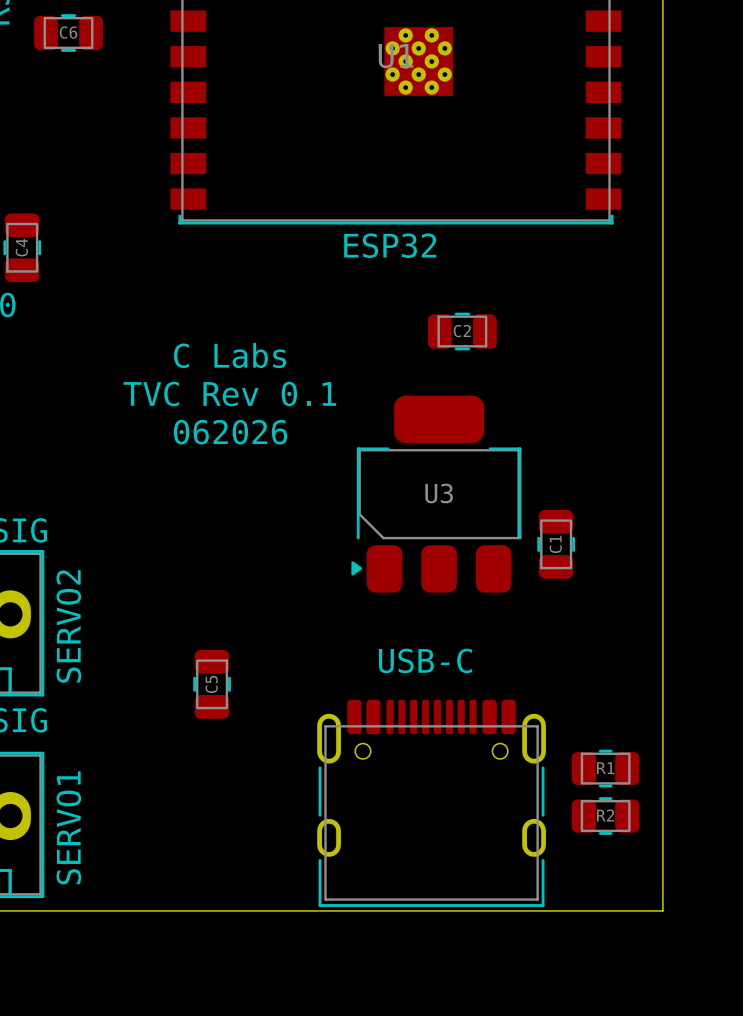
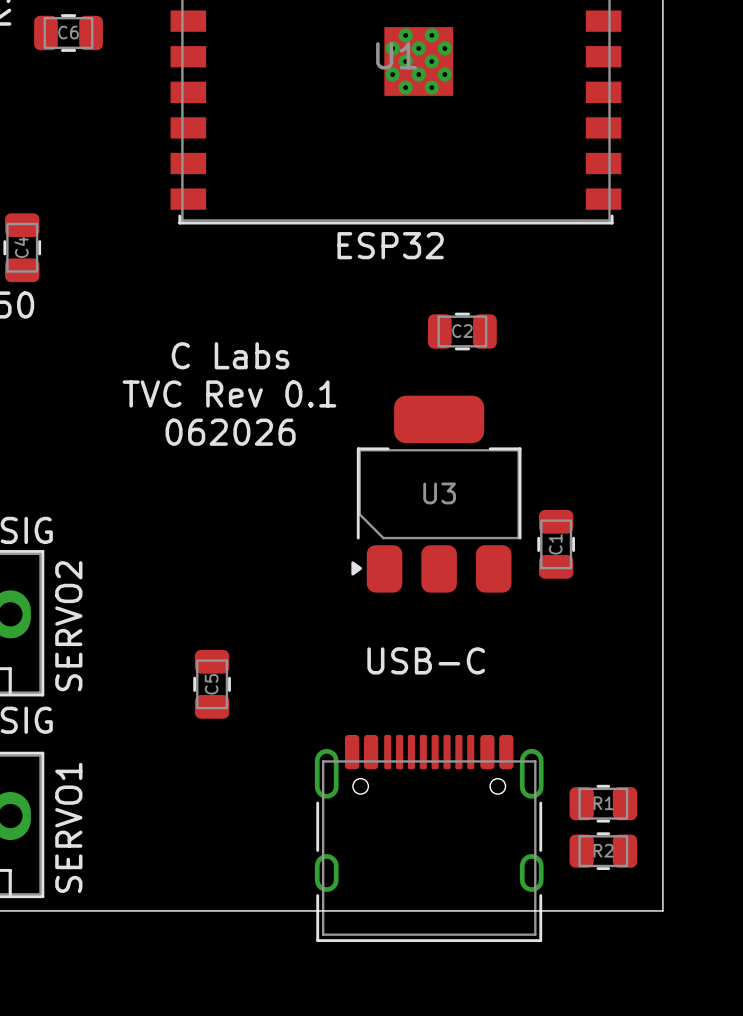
R1 position: (605, 768) -> (603, 803)
part position: (431, 803) -> (429, 838)
R2 position: (605, 816) -> (603, 851)

